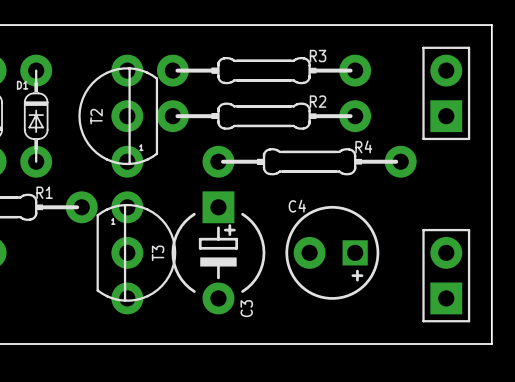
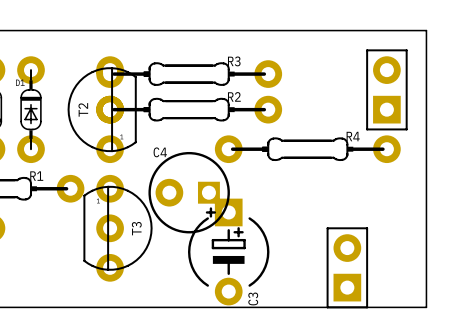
R3 position: (264, 70) -> (189, 74)
R2 position: (264, 116) -> (189, 109)
R4 position: (309, 161) -> (307, 149)
C3 position: (218, 252) -> (228, 252)
C4 position: (332, 252) -> (189, 192)
part position: (446, 275) -> (347, 267)

